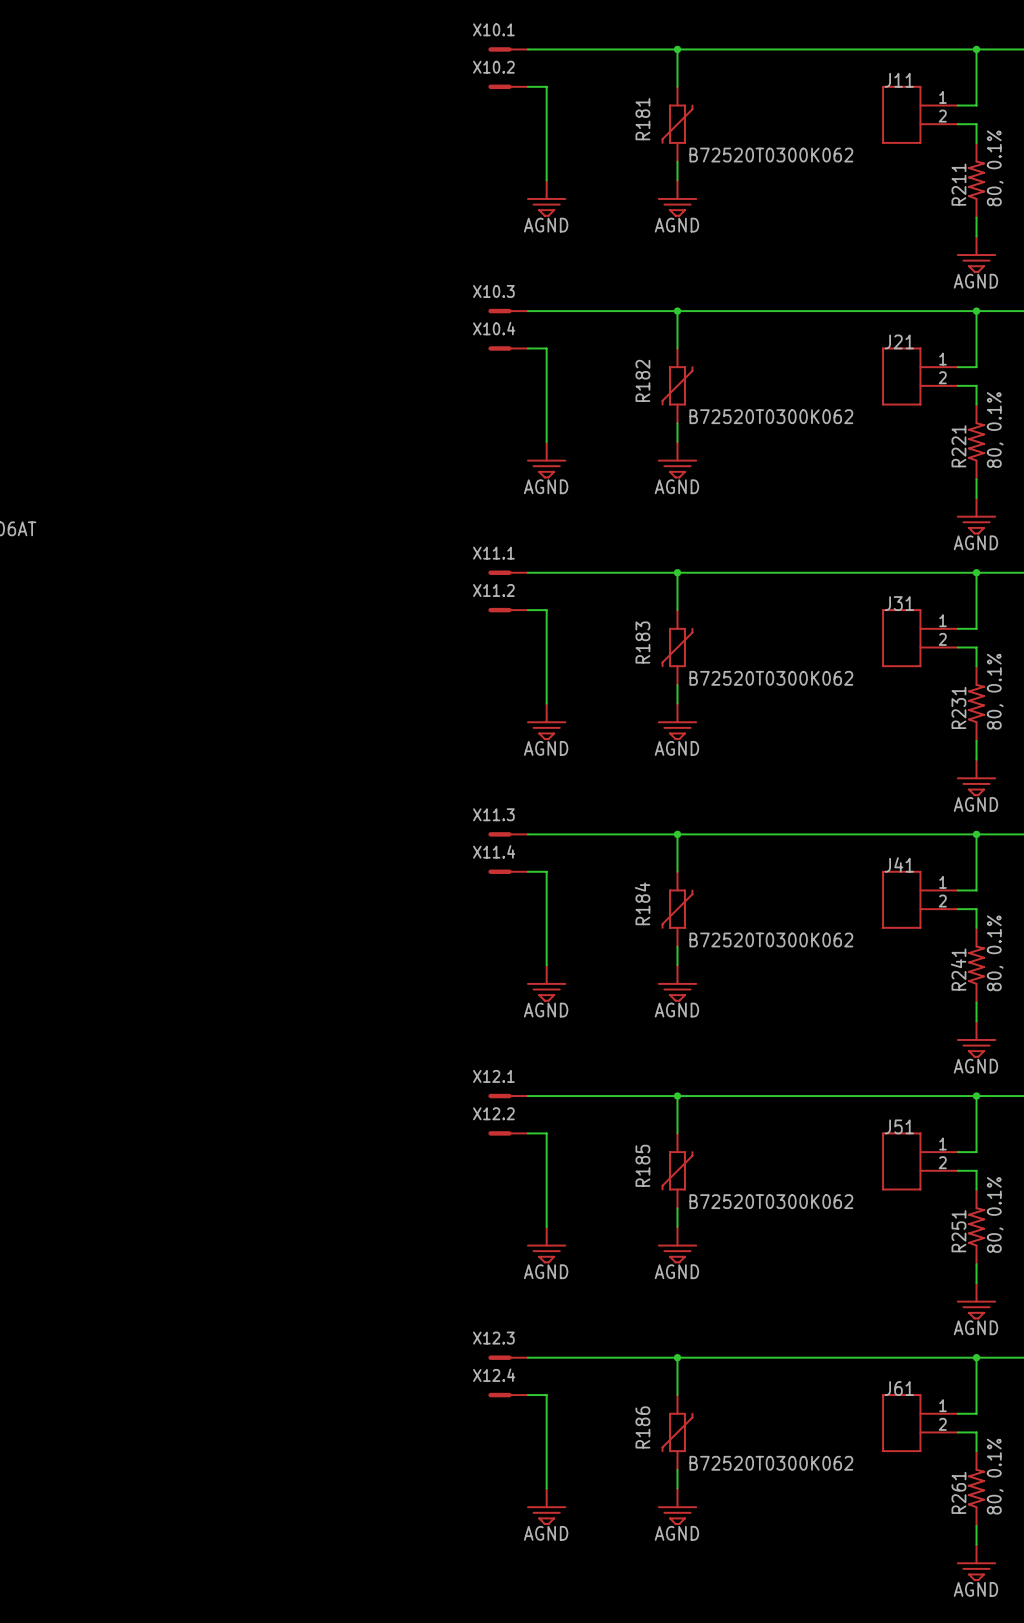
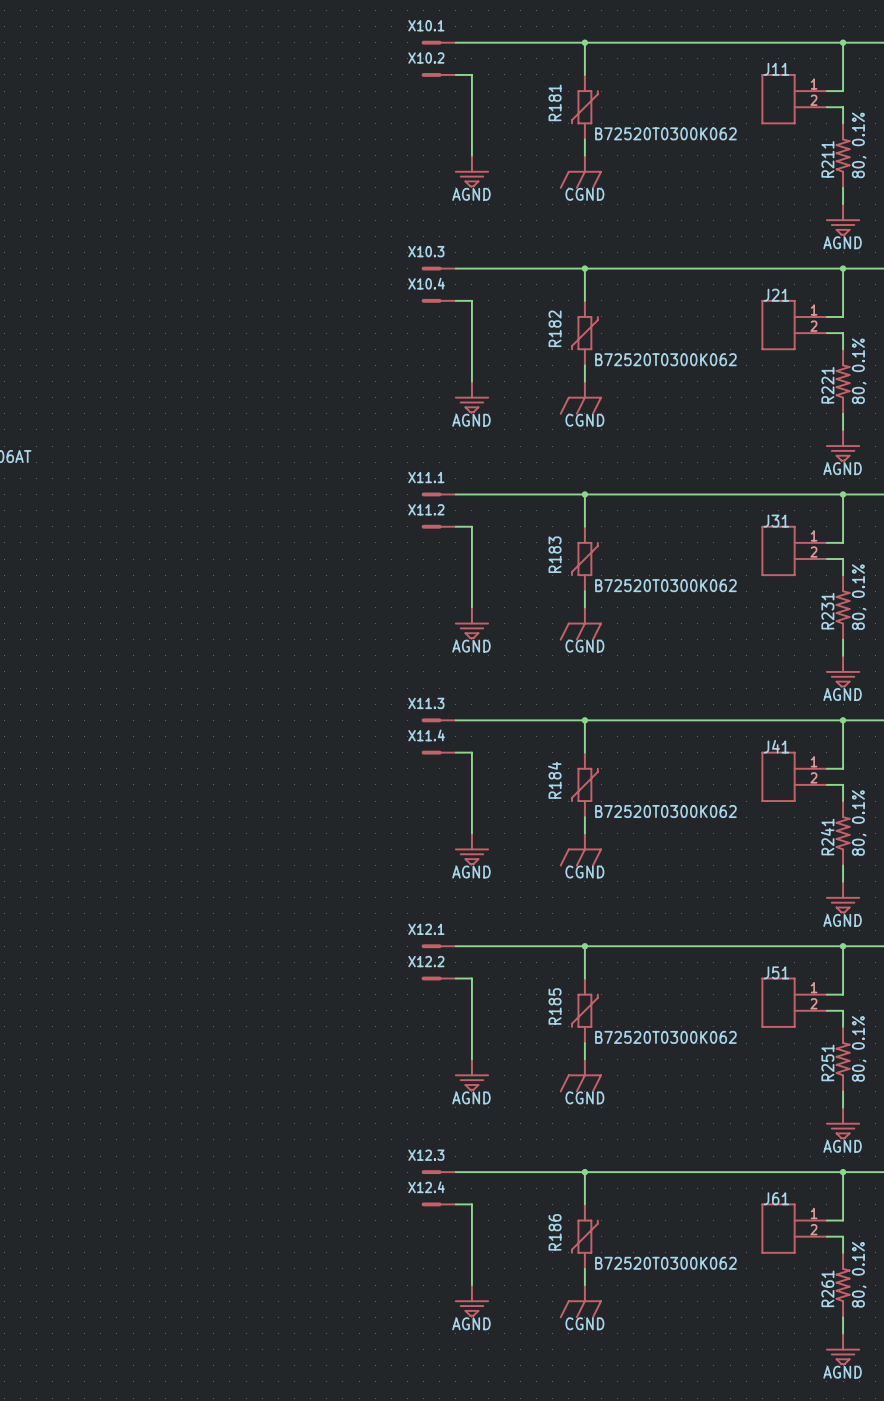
power symbol: AGND (677, 198) -> CGND (580, 172)
power symbol: AGND (677, 460) -> CGND (580, 398)
power symbol: AGND (677, 721) -> CGND (580, 623)
power symbol: AGND (677, 983) -> CGND (580, 849)
power symbol: AGND (677, 1245) -> CGND (580, 1075)
power symbol: AGND (677, 1506) -> CGND (580, 1301)

